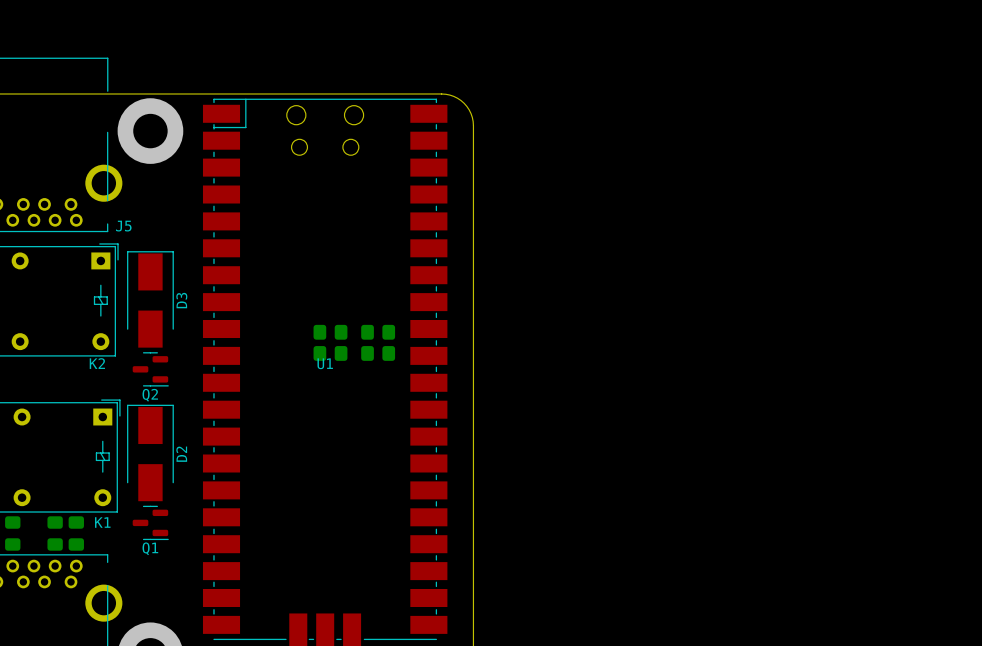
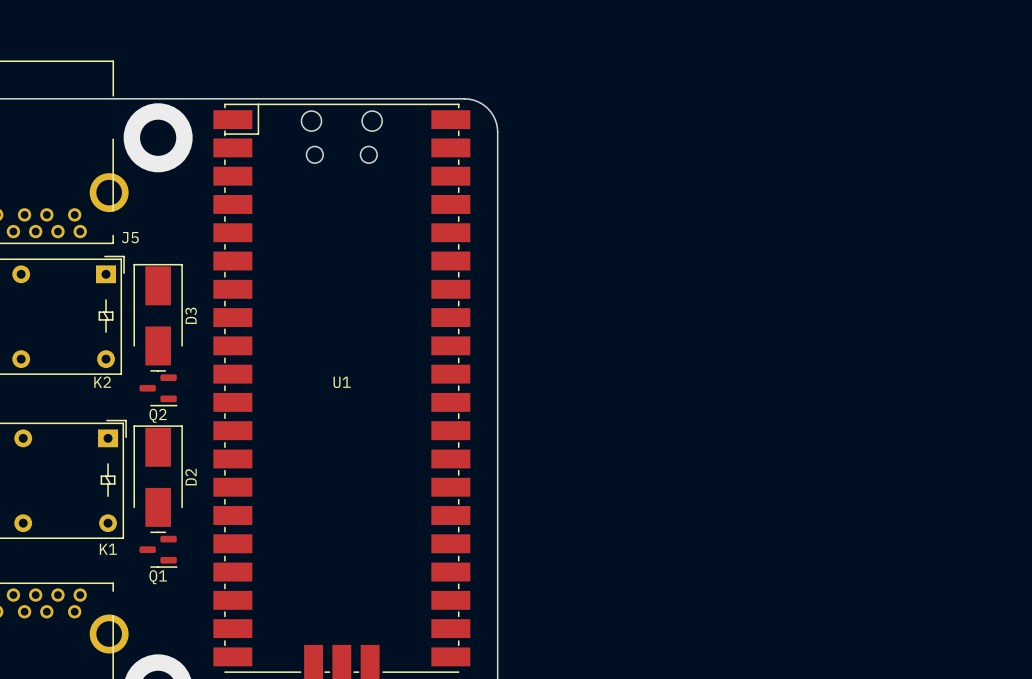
part: (330, 332) -> none
part: (378, 332) -> none
part: (330, 353) -> none
part: (378, 353) -> none
part: (12, 533) -> none
part: (55, 533) -> none
part: (76, 533) -> none

